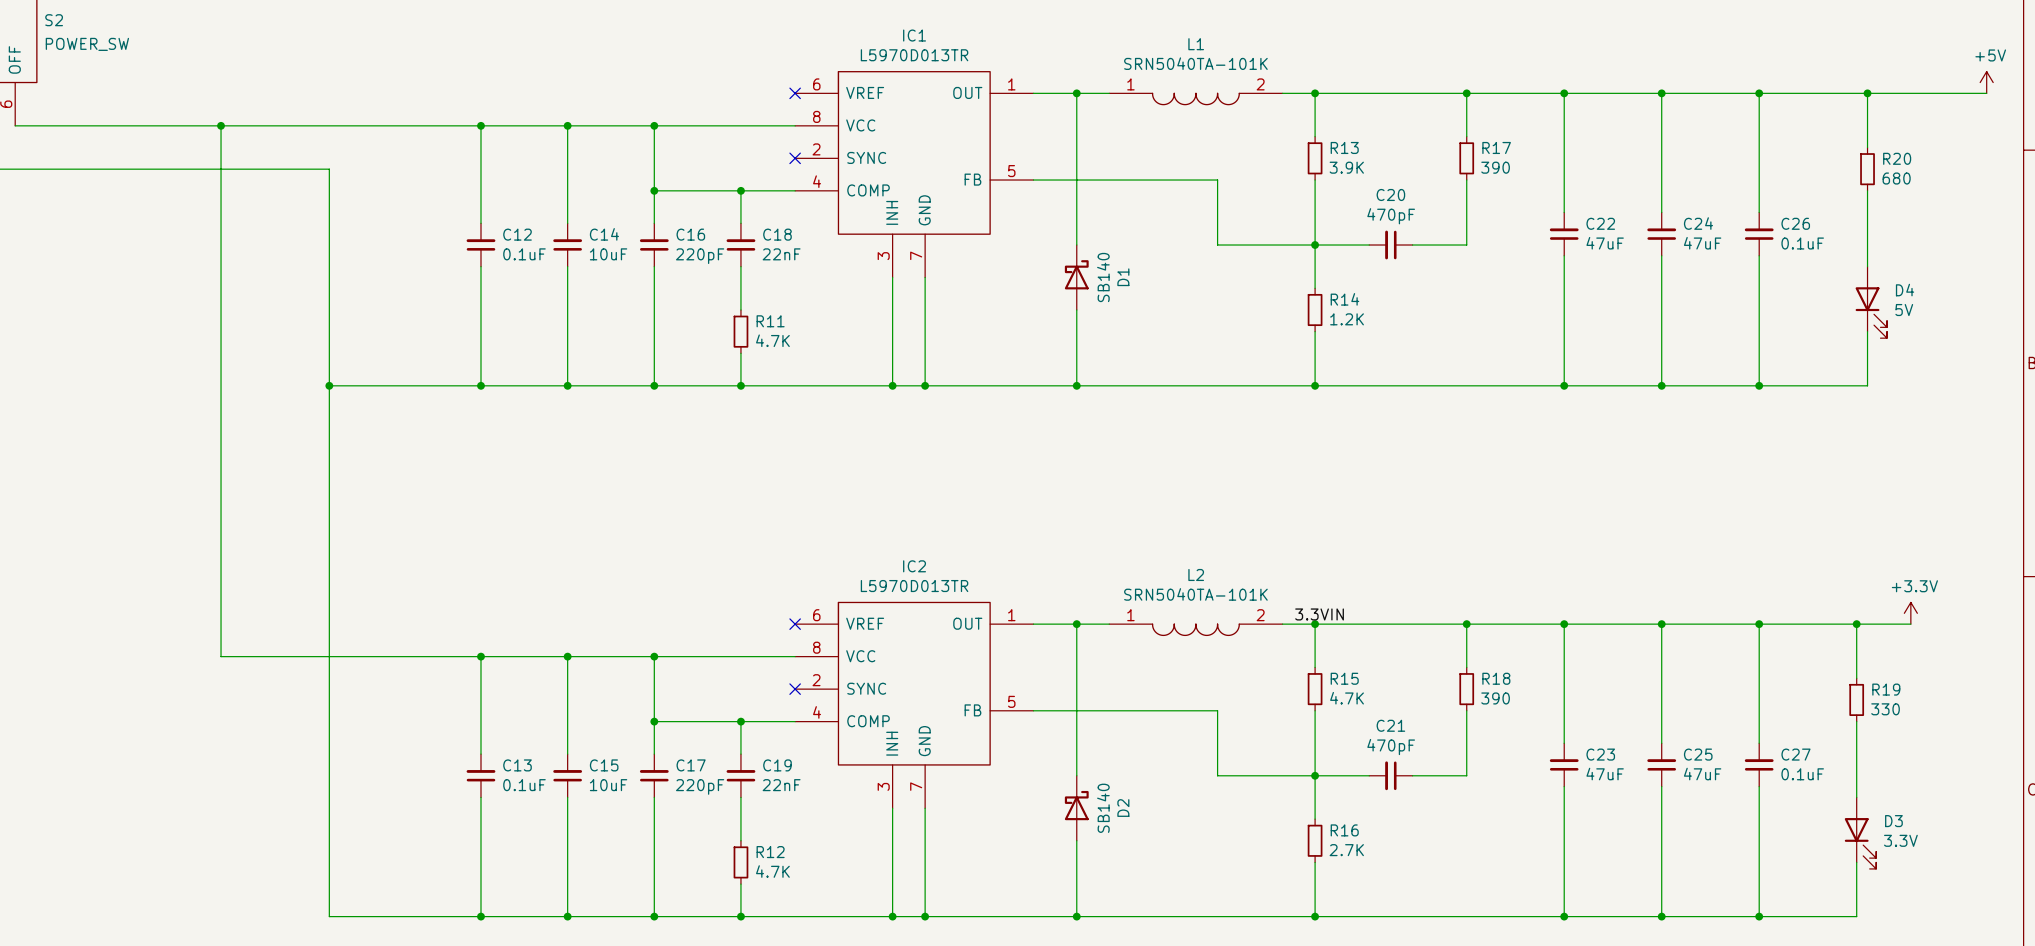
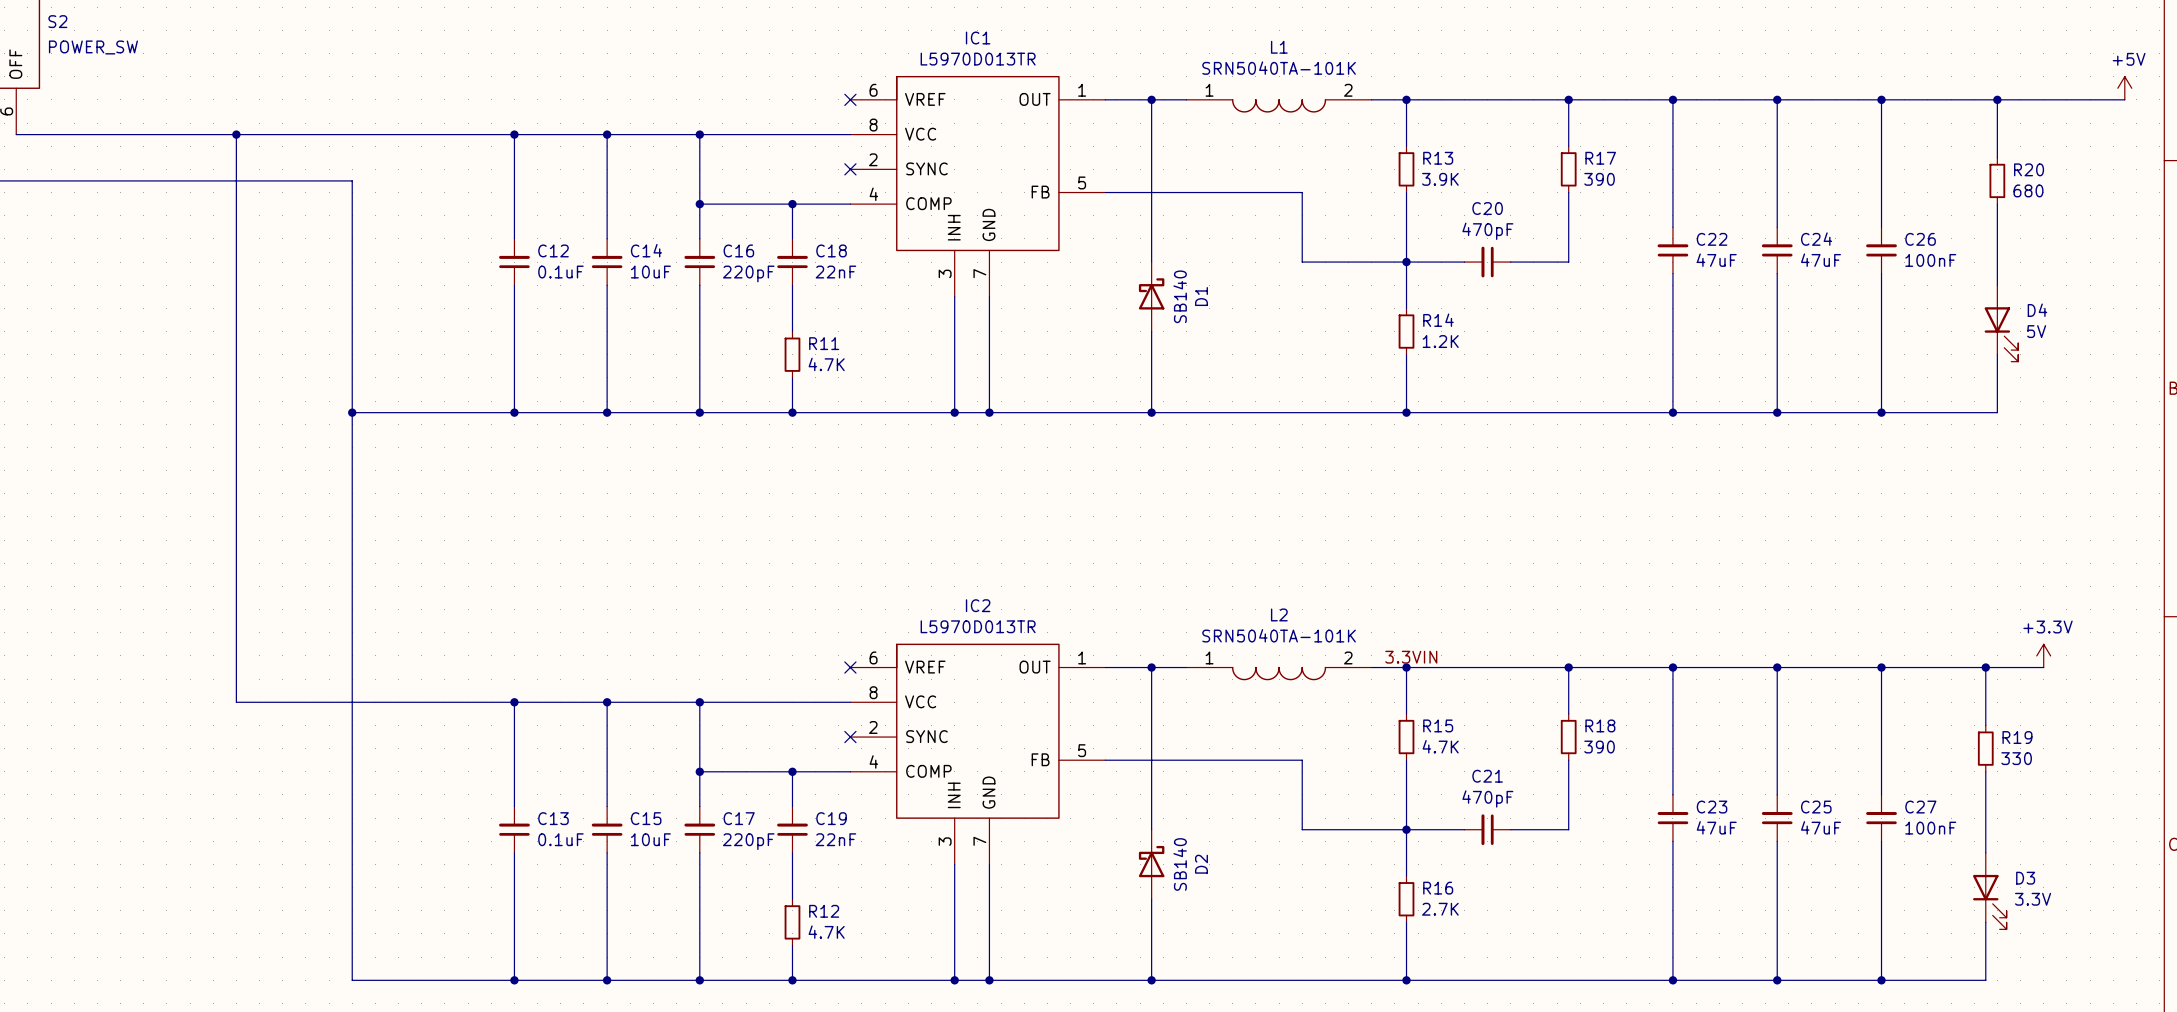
C26 value: 0.1uF (1802, 243) -> 100nF (1930, 260)
C27 value: 0.1uF (1802, 774) -> 100nF (1930, 828)

